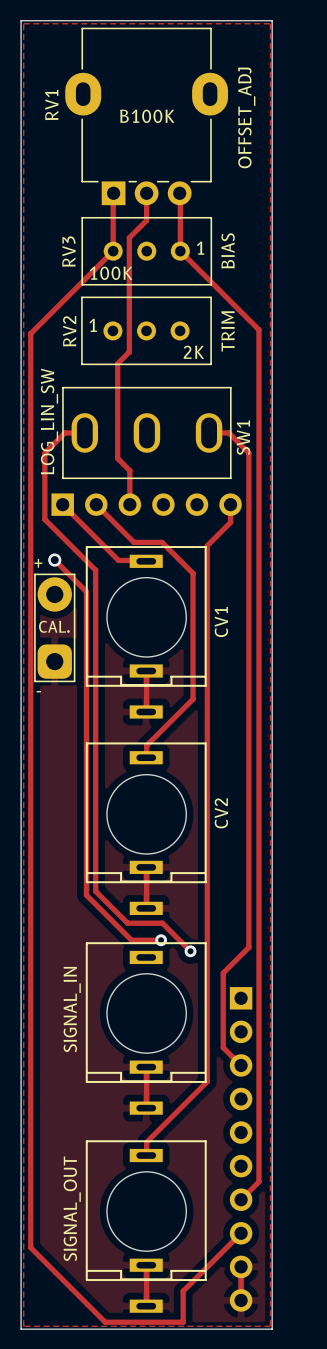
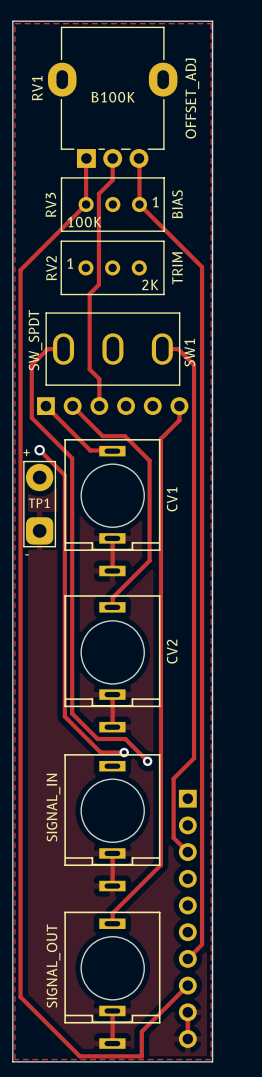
SW1 value: LOG_LIN_SW (49, 421) -> SW_SPDT (35, 340)
CAL. name: CAL. (54, 626) -> TP1 (39, 503)

